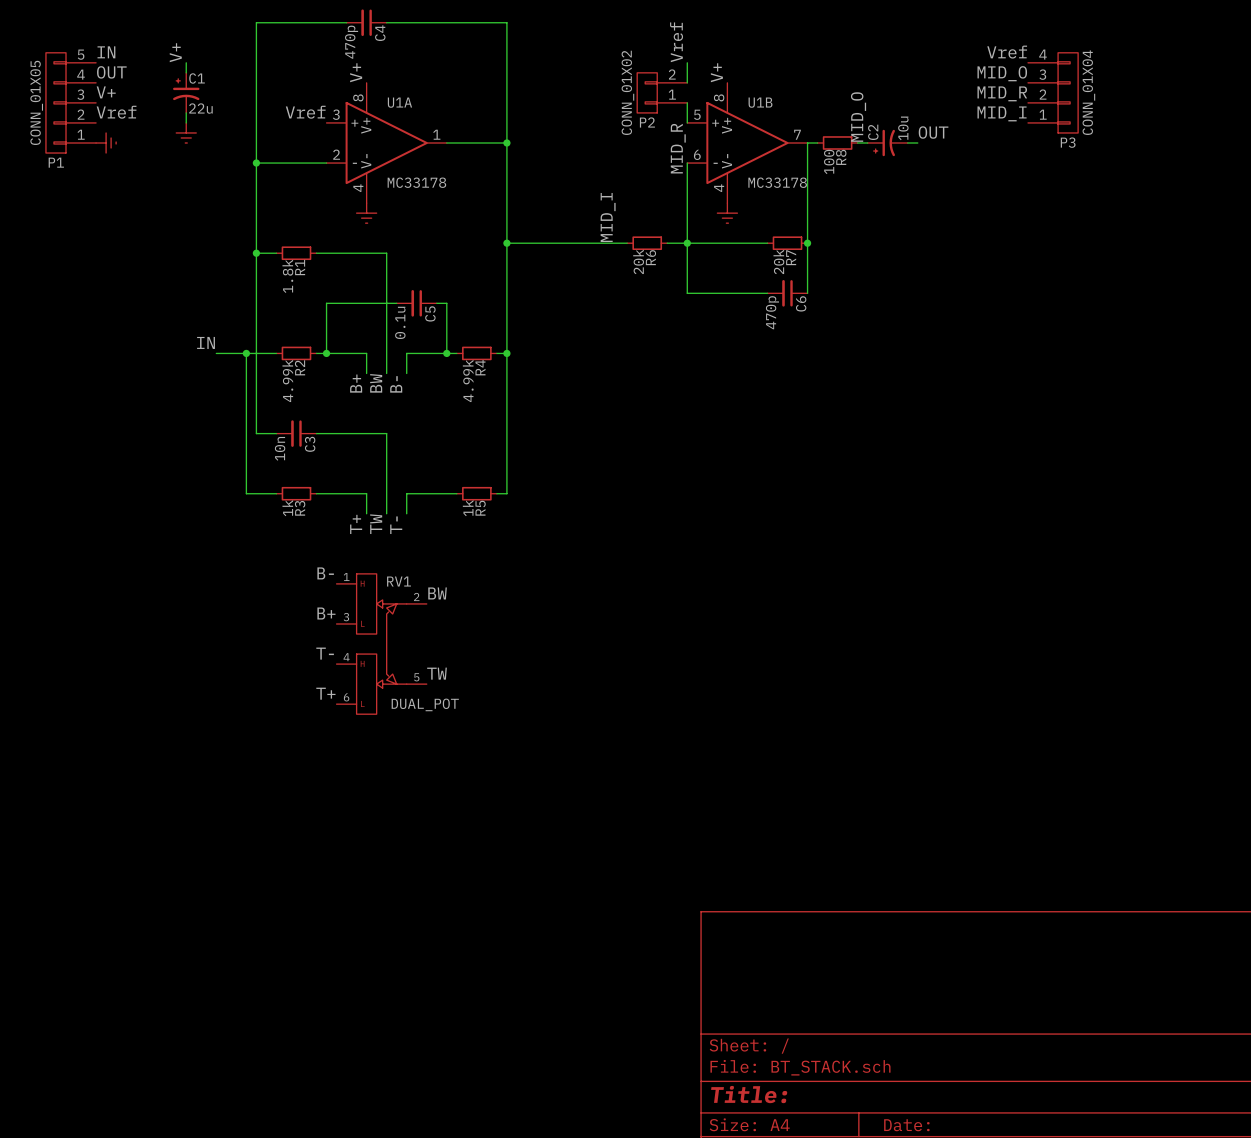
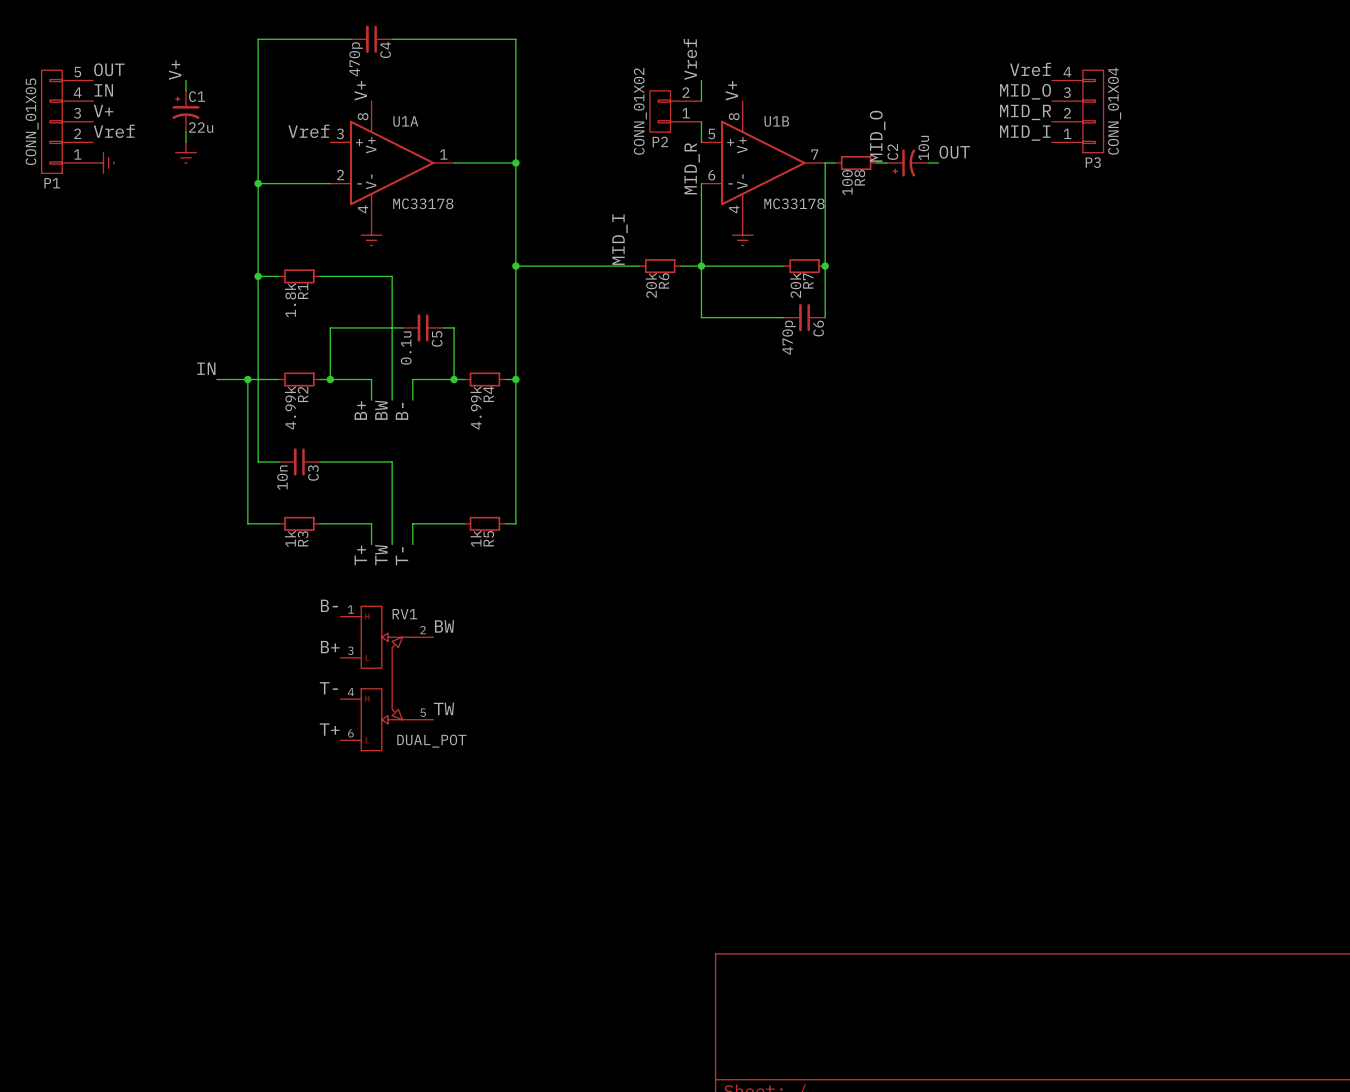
label: IN (106, 52) -> OUT (109, 69)
label: OUT (111, 72) -> IN (103, 90)

